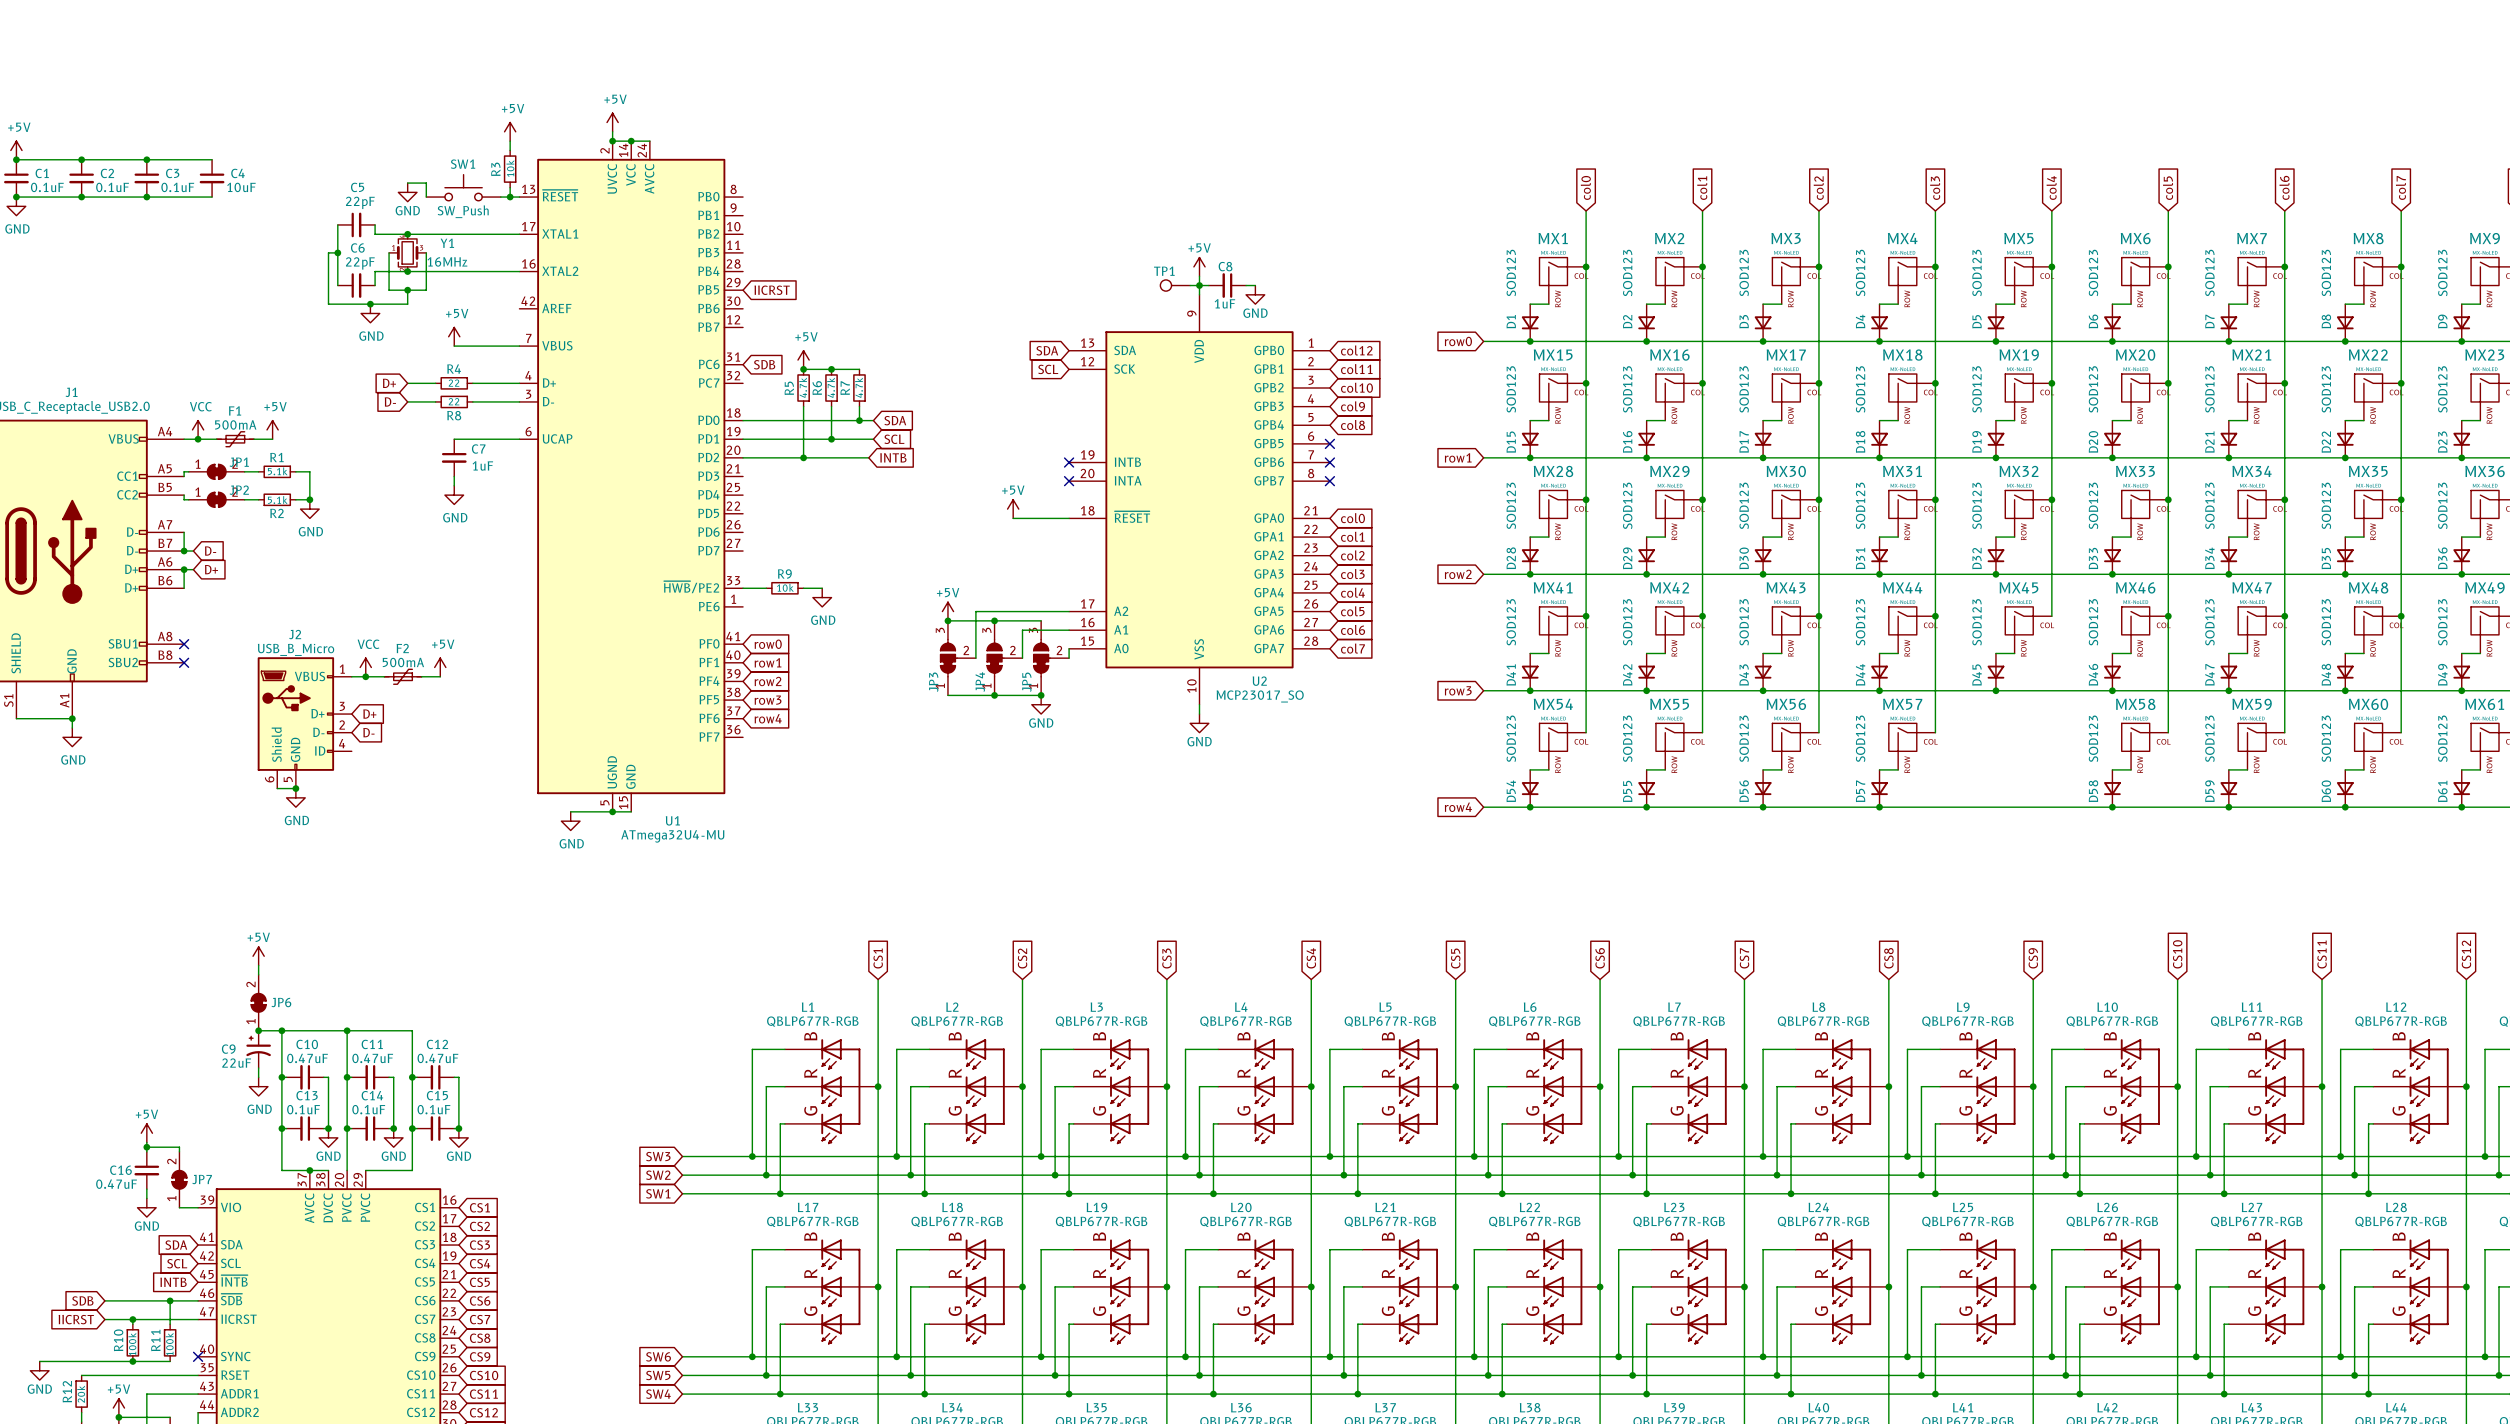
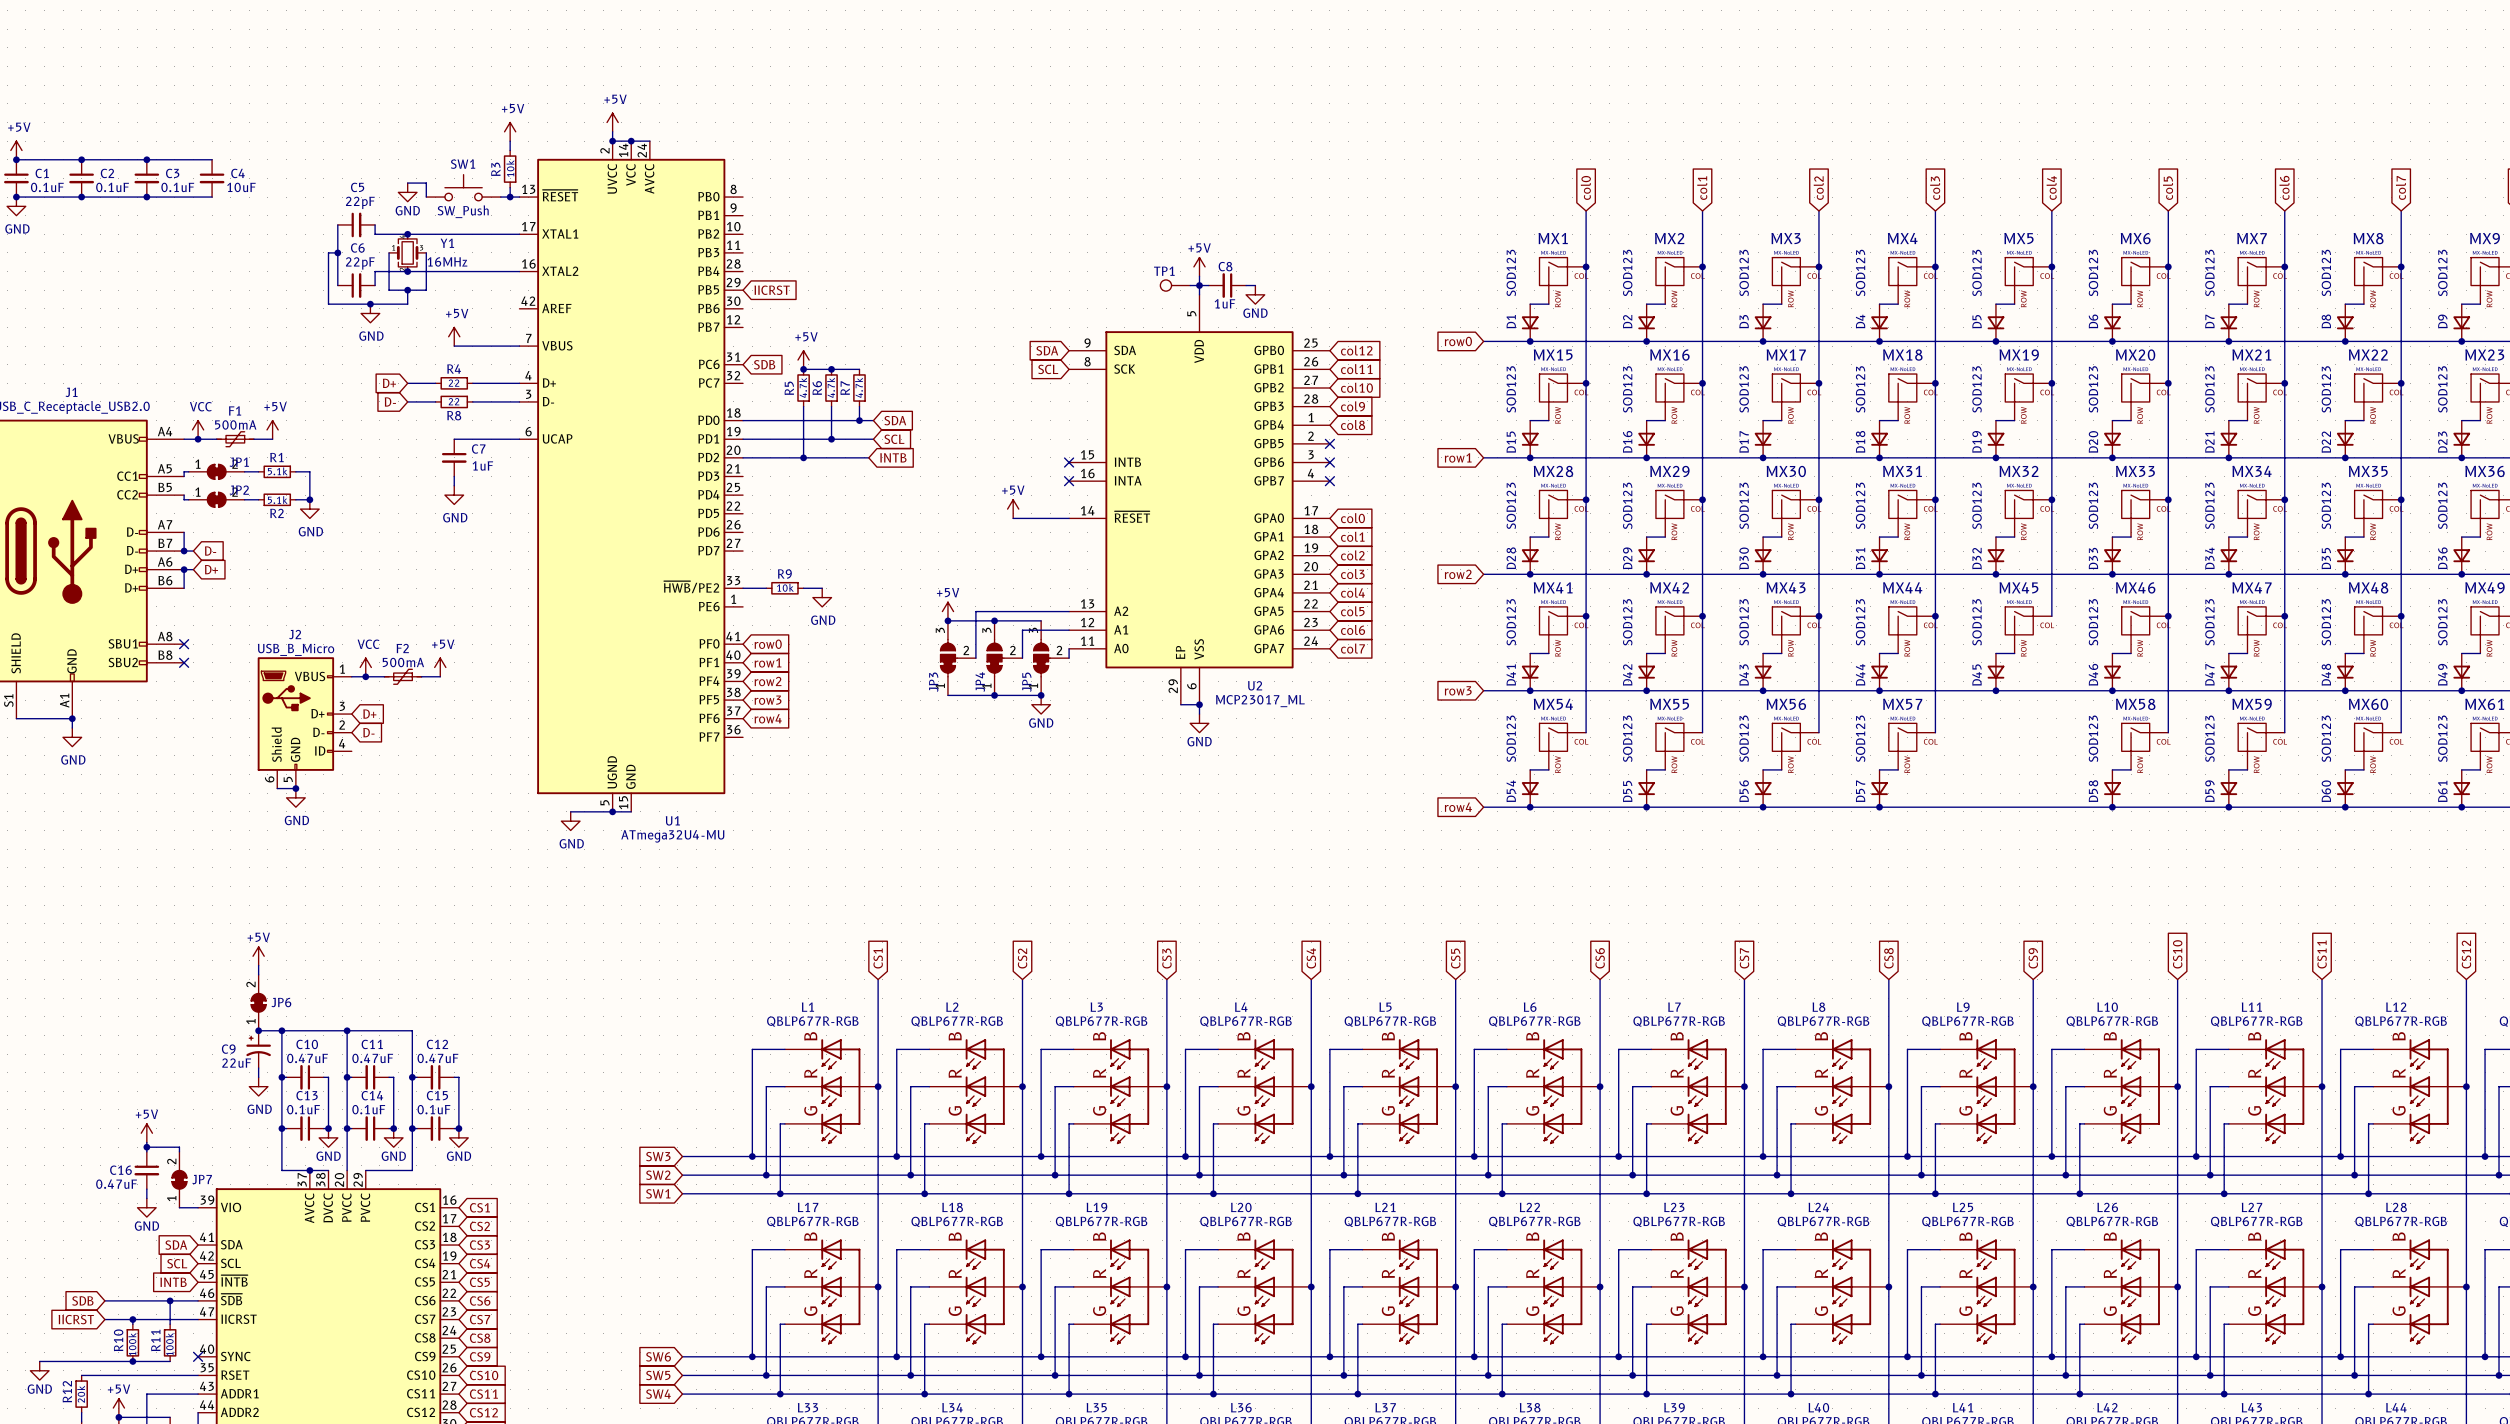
U2 symbol: [1069, 294, 1330, 705] -> [1069, 294, 1330, 705]
U2 value: MCP23017_SO (1260, 696) -> MCP23017_ML (1260, 701)
wire: none -> (1180, 704) (1199, 704)
junction: none -> (1199, 704)

